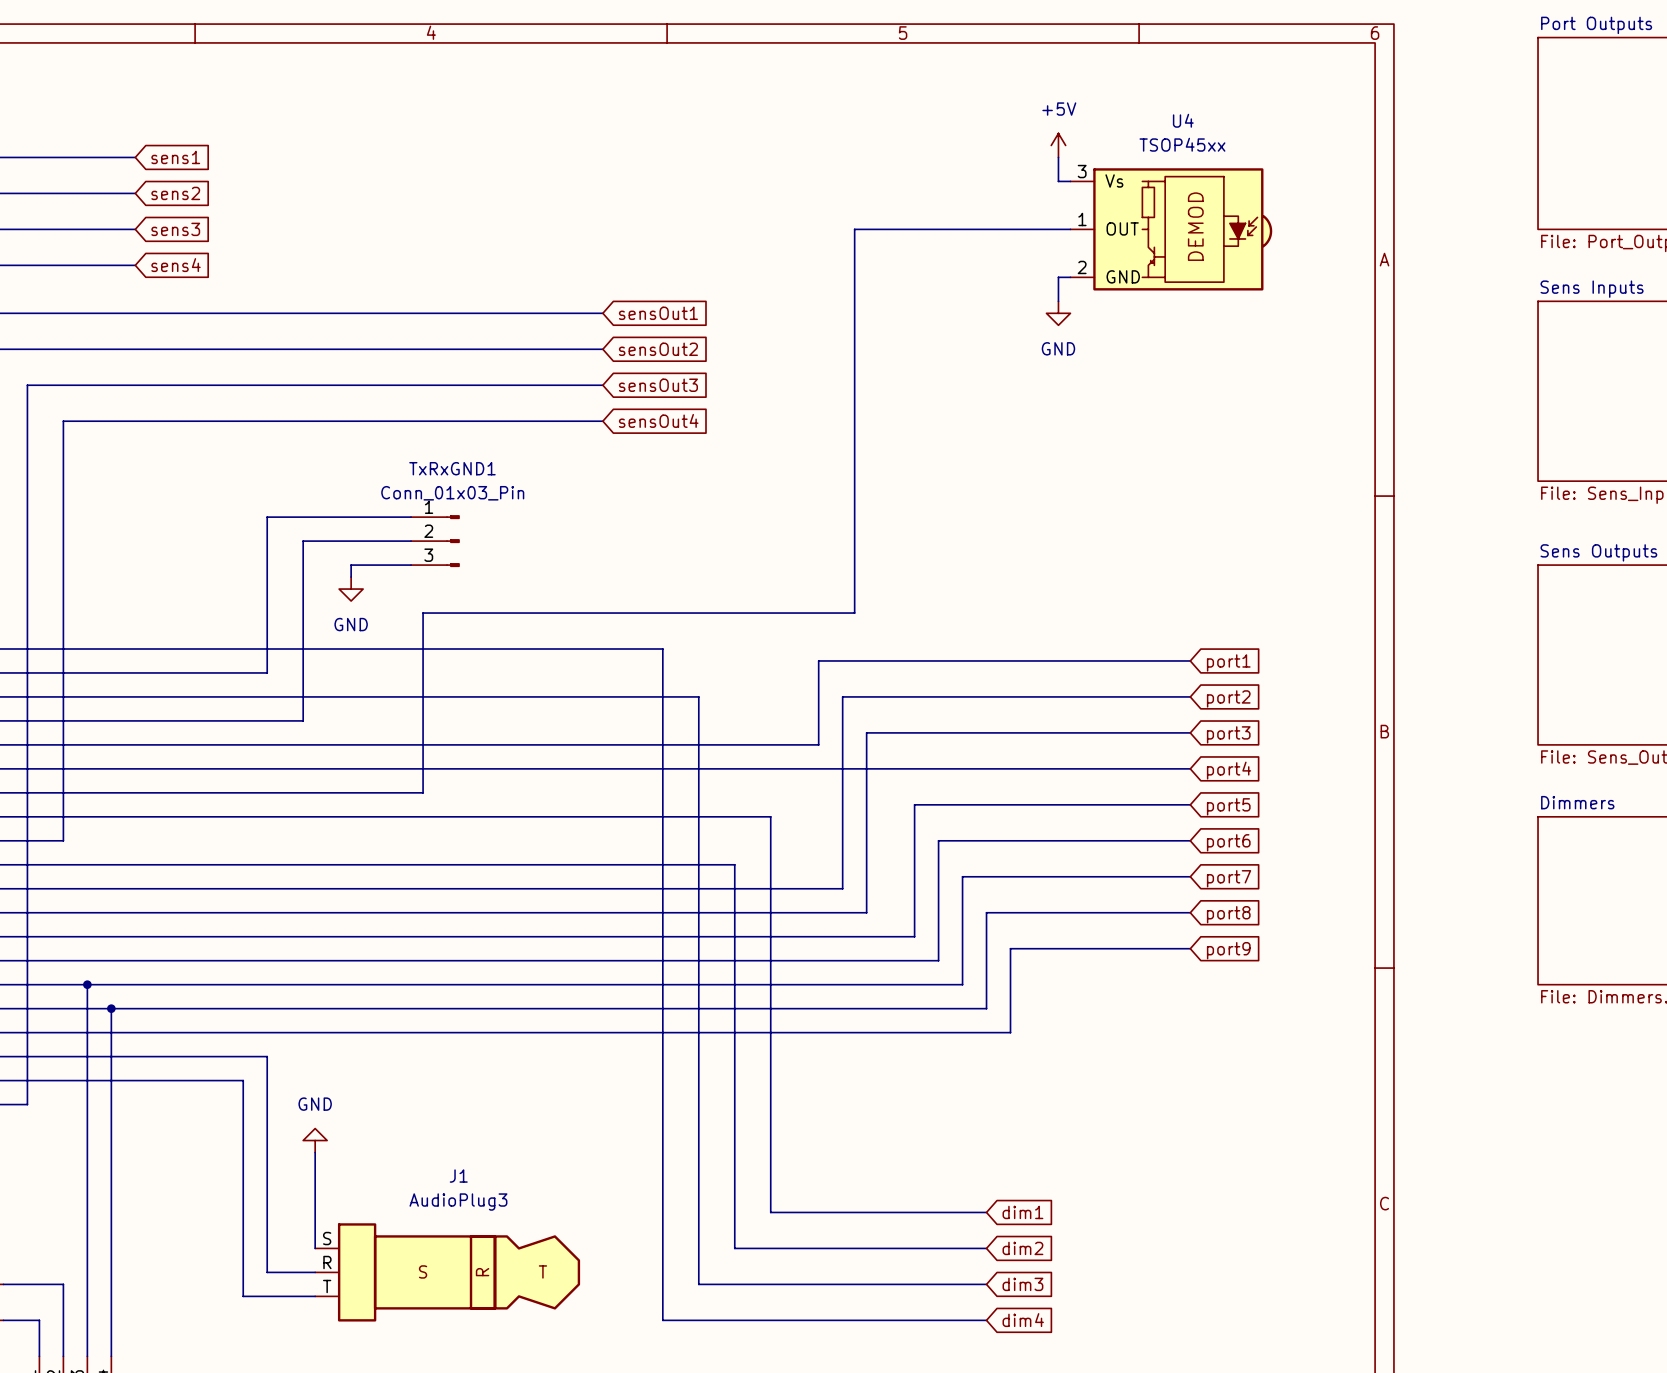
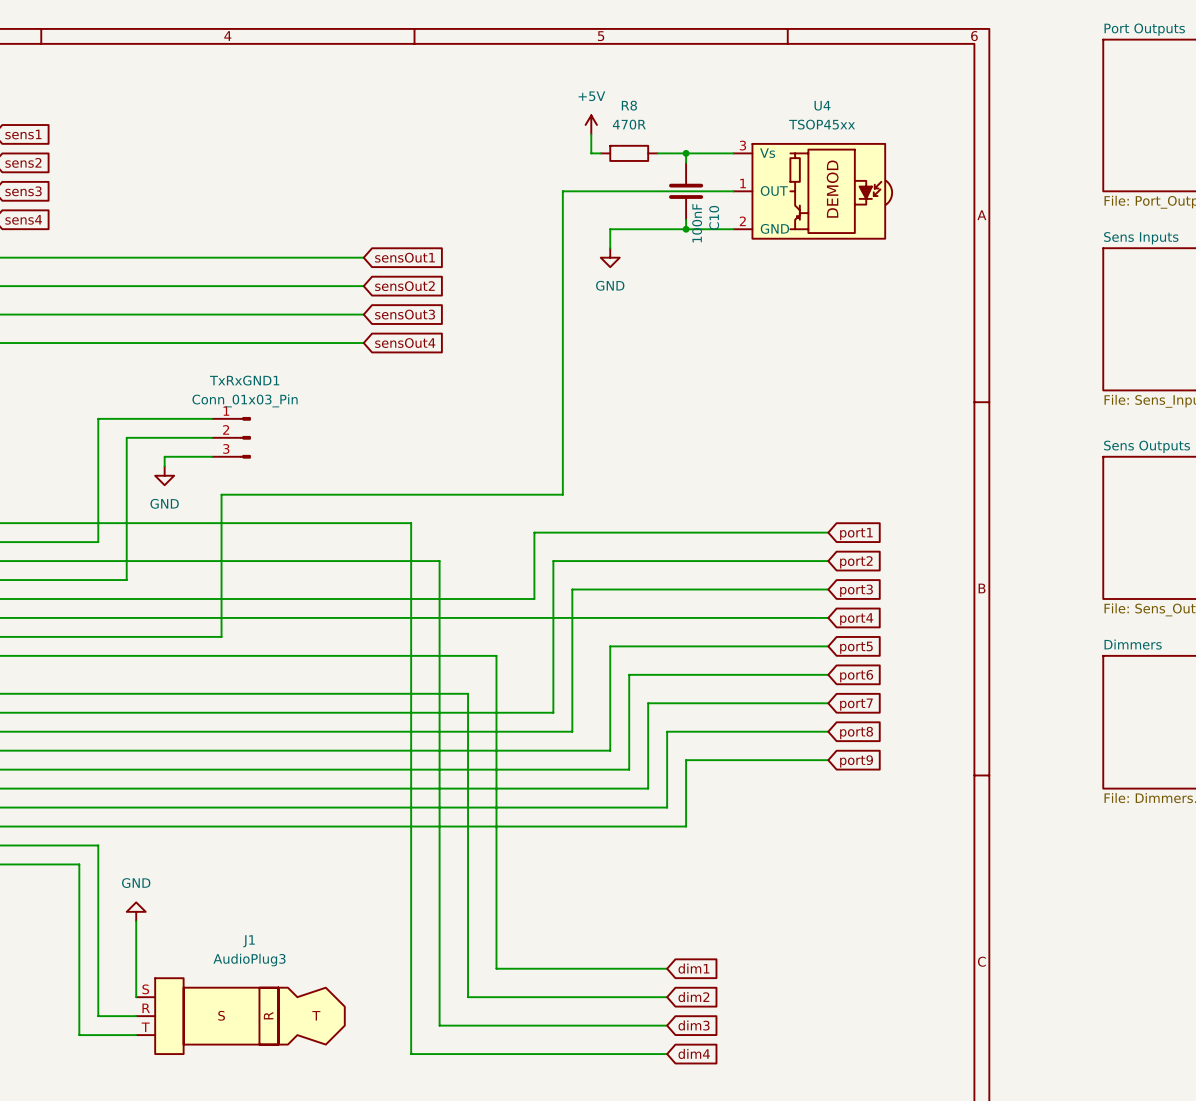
power symbol position: +5V (1058, 145) -> +5V (591, 124)
wire: none -> (591, 134) (591, 153) (600, 153)
wire: (1058, 157) (1058, 181) -> (657, 153) (724, 153)
R8: none -> 470R (629, 153)
wire: none -> (686, 153) (686, 162)
junction: none -> (686, 153)
C10: none -> 100nF (686, 191)
wire: none -> (686, 219) (686, 229)
junction: none -> (686, 229)
wire: (1058, 277) (1058, 301) -> (724, 229) (610, 229) (610, 248)
power symbol position: GND (1058, 313) -> GND (610, 257)

